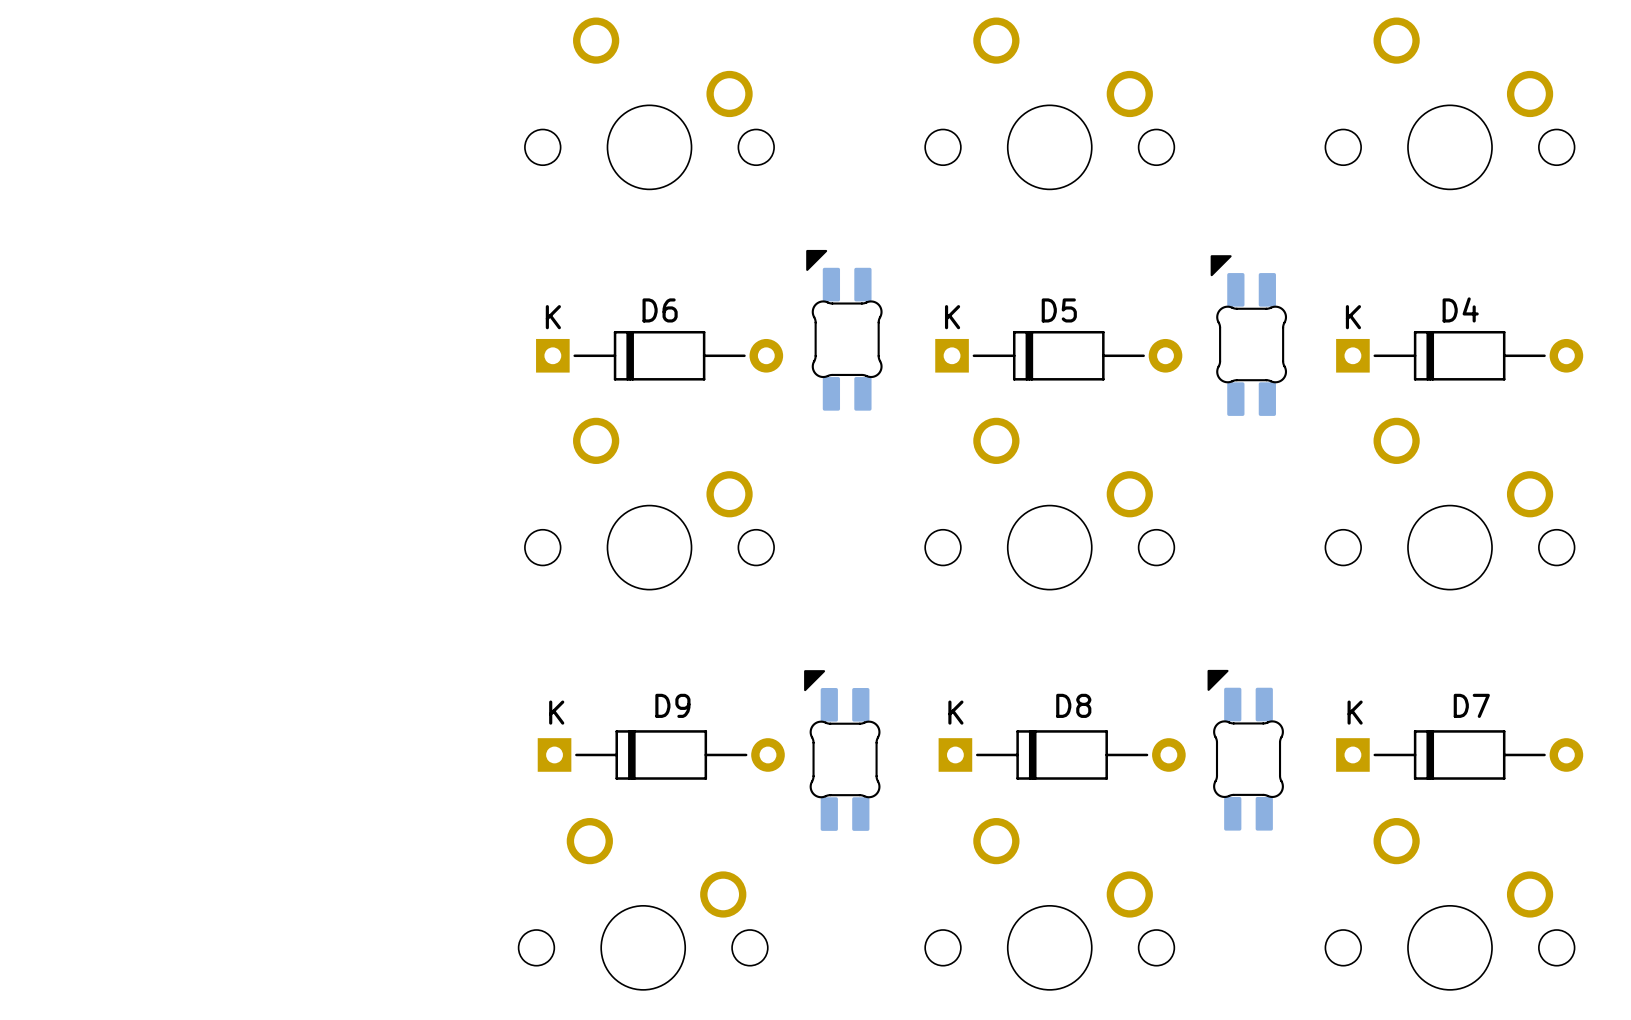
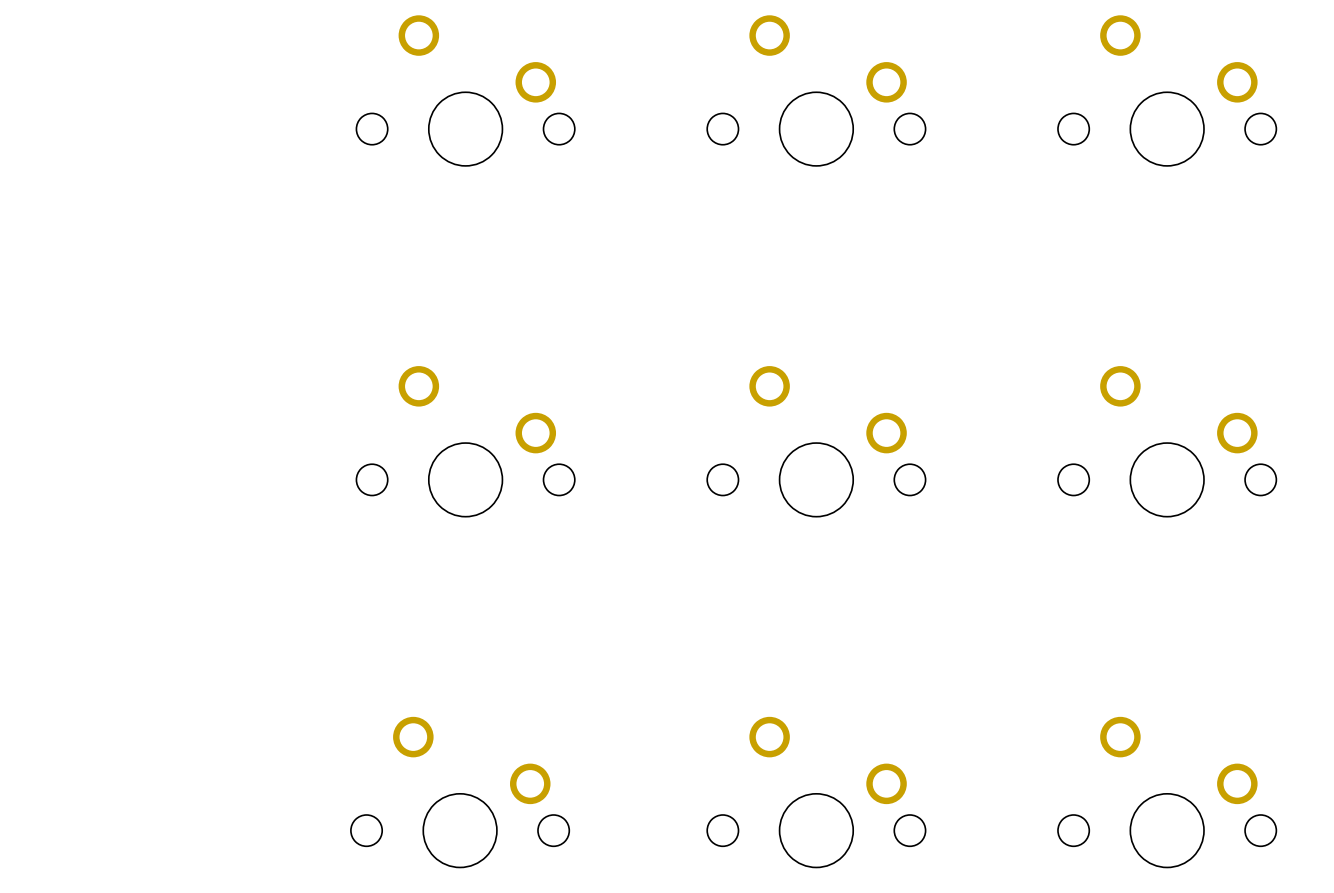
part: (844, 330) -> none
part: (1248, 335) -> none
D6: (659, 355) -> none
D5: (1058, 355) -> none
D4: (1459, 355) -> none
part: (842, 750) -> none
part: (1245, 750) -> none
D9: (661, 754) -> none
D8: (1062, 754) -> none
D7: (1459, 754) -> none

